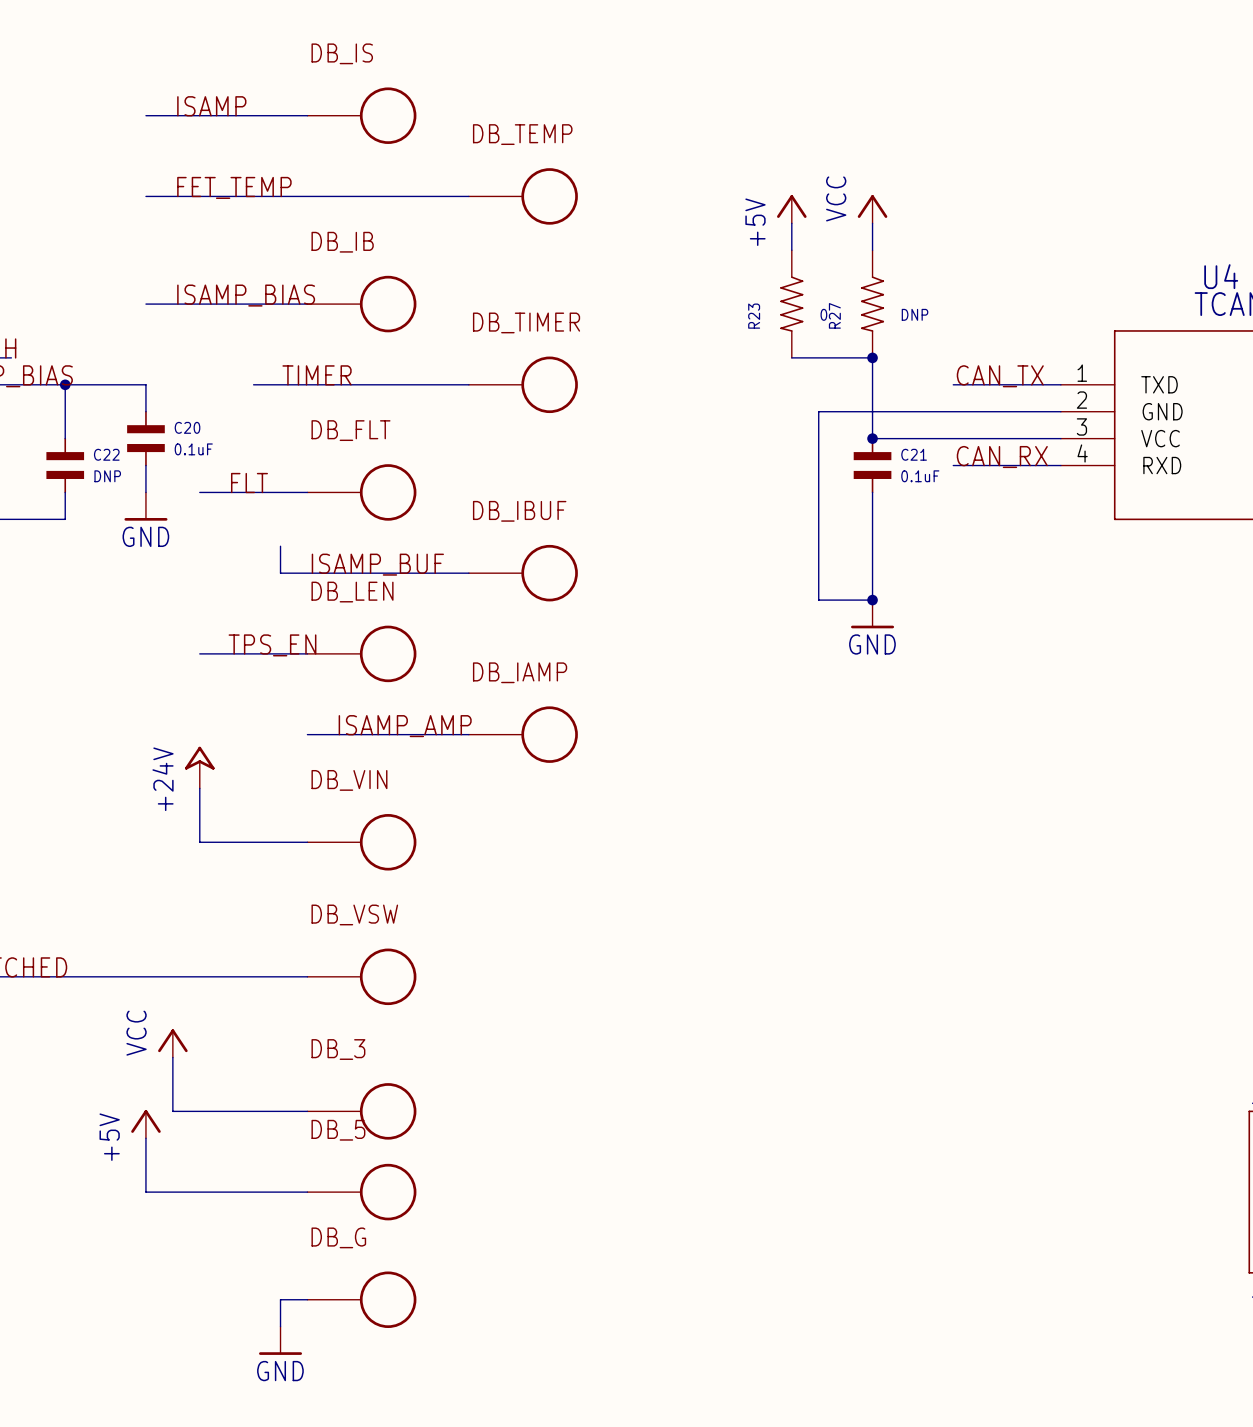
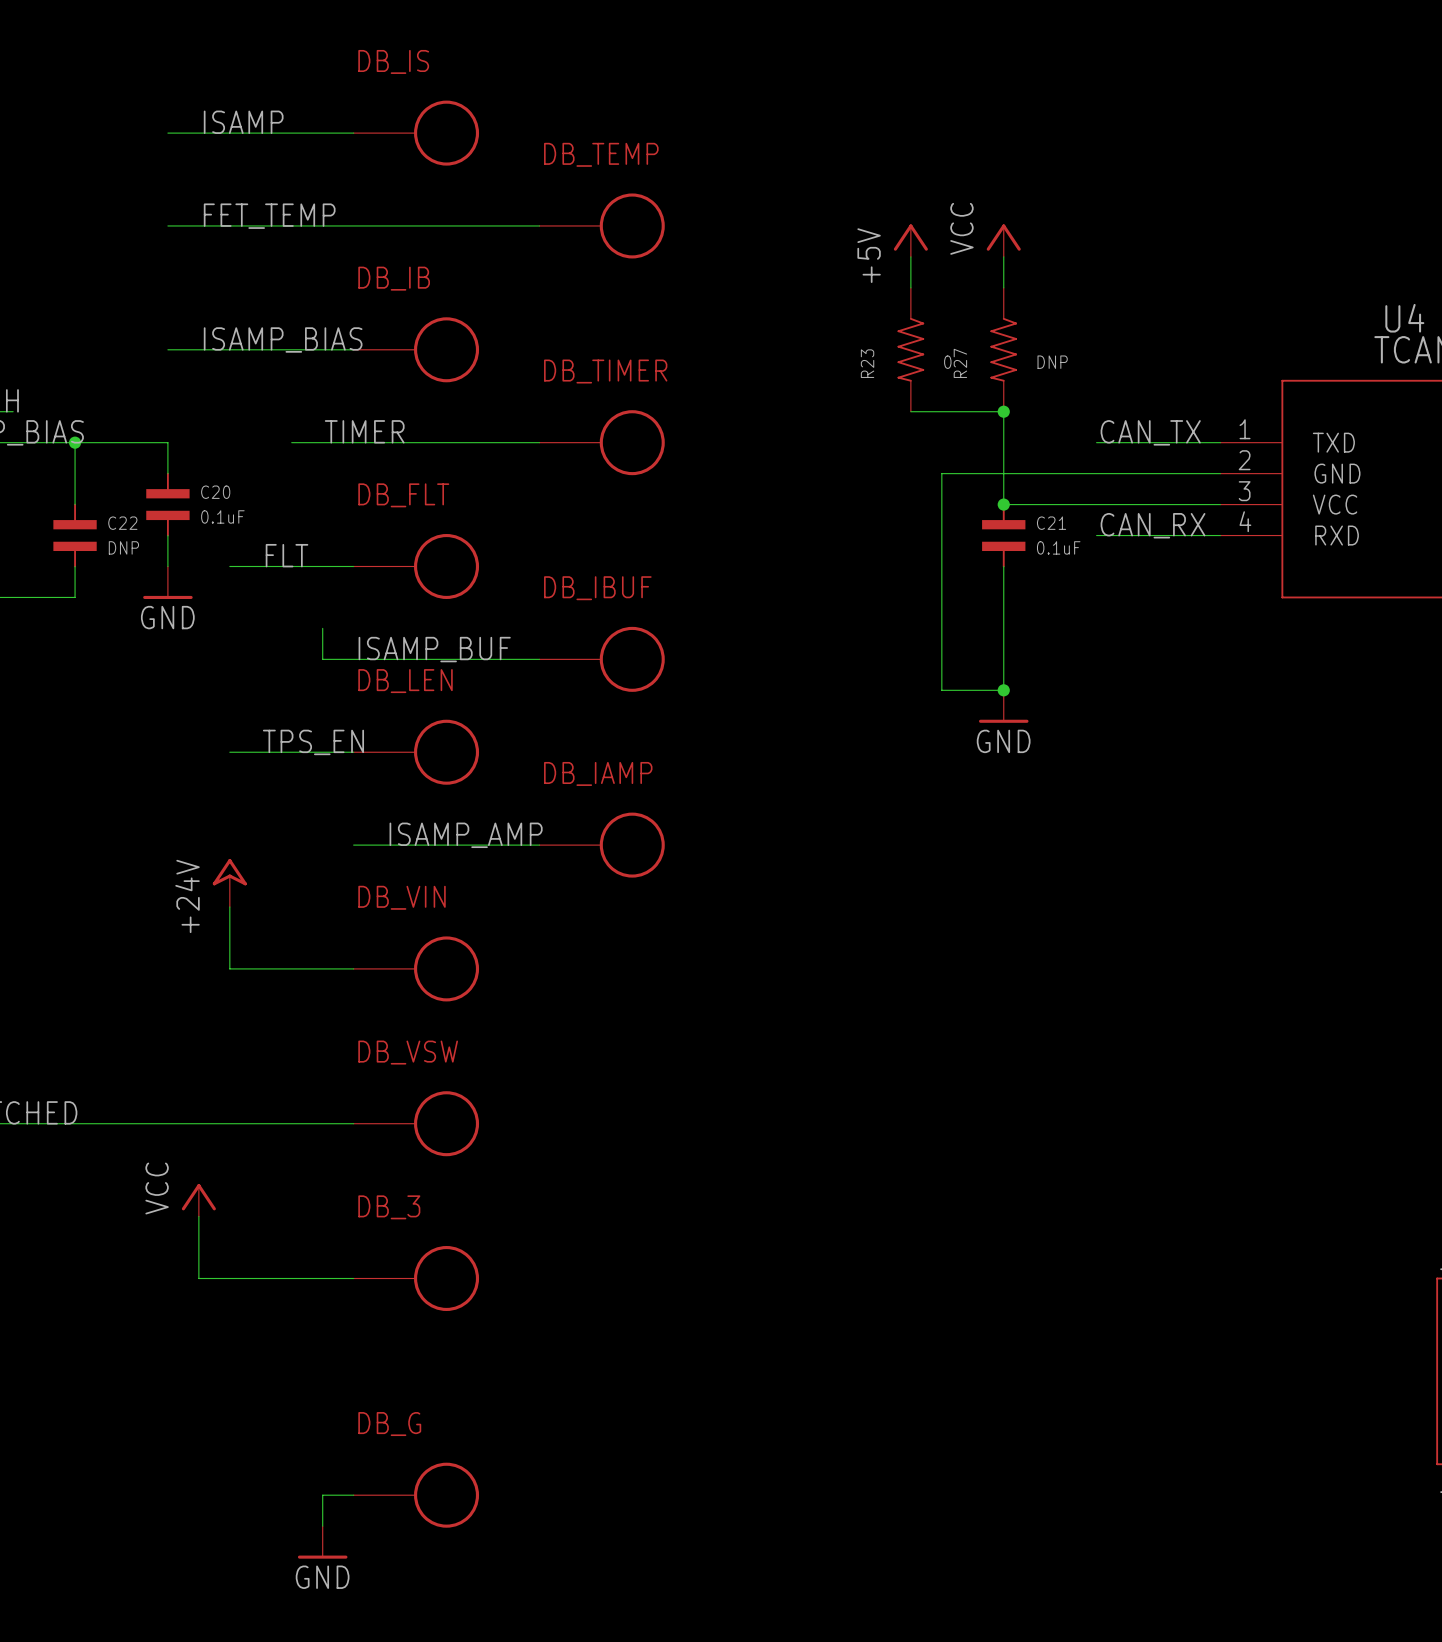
power symbol: +5V (145, 1124) -> none
wire: (145, 1138) (145, 1192) (307, 1192) -> none
DB_5: (361, 1192) -> none

